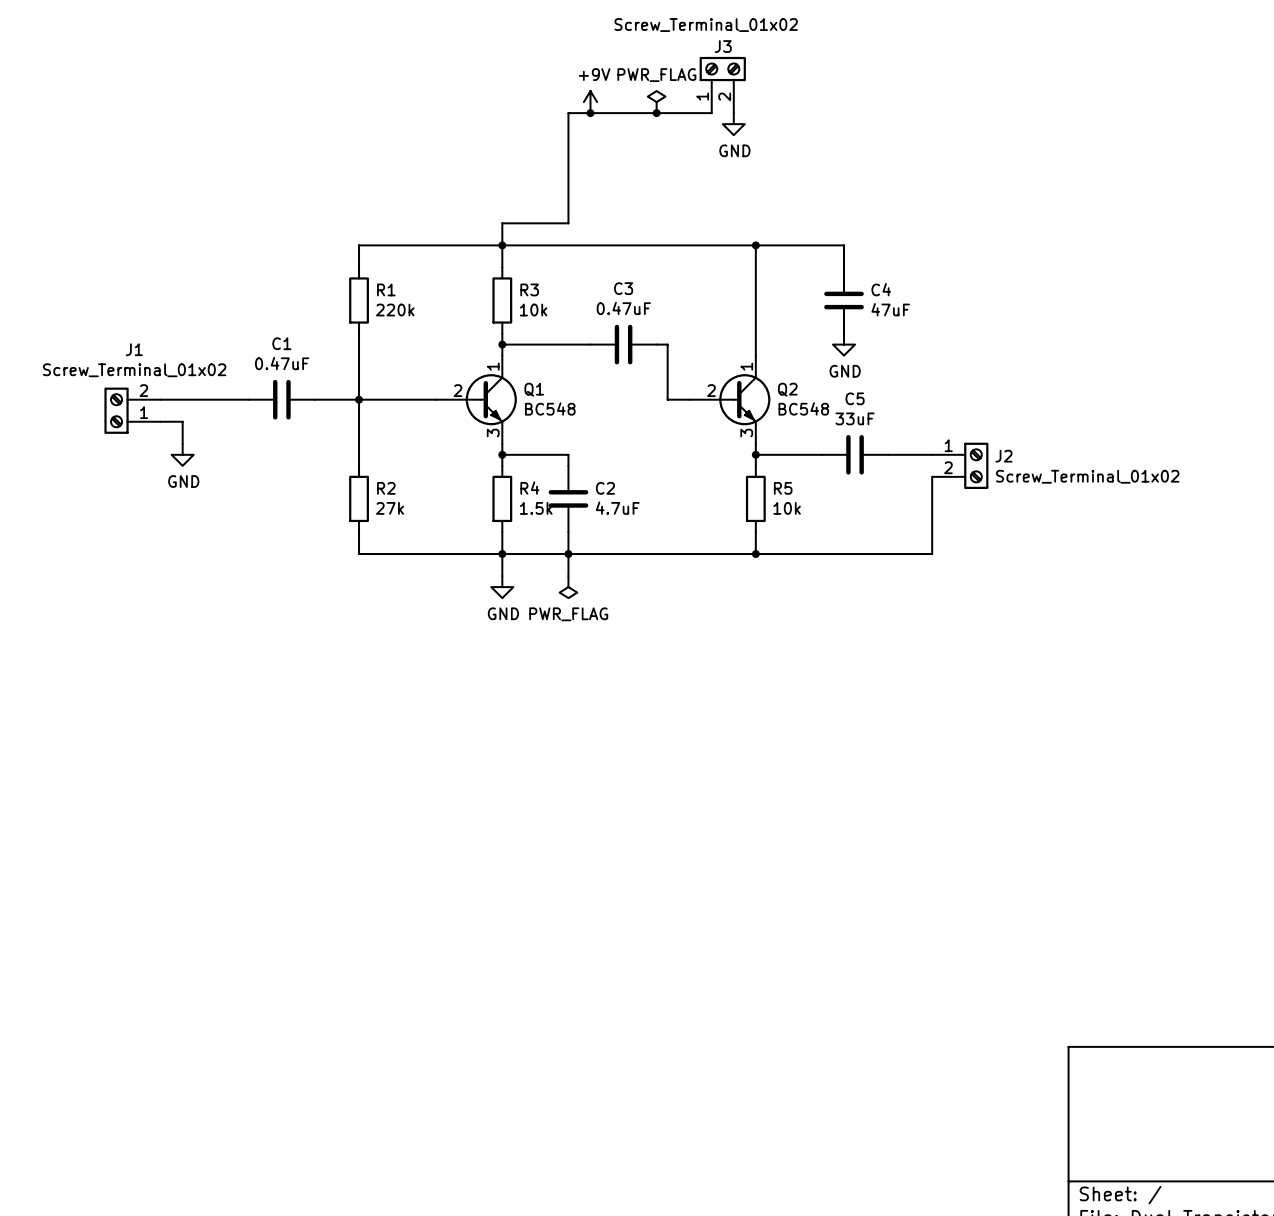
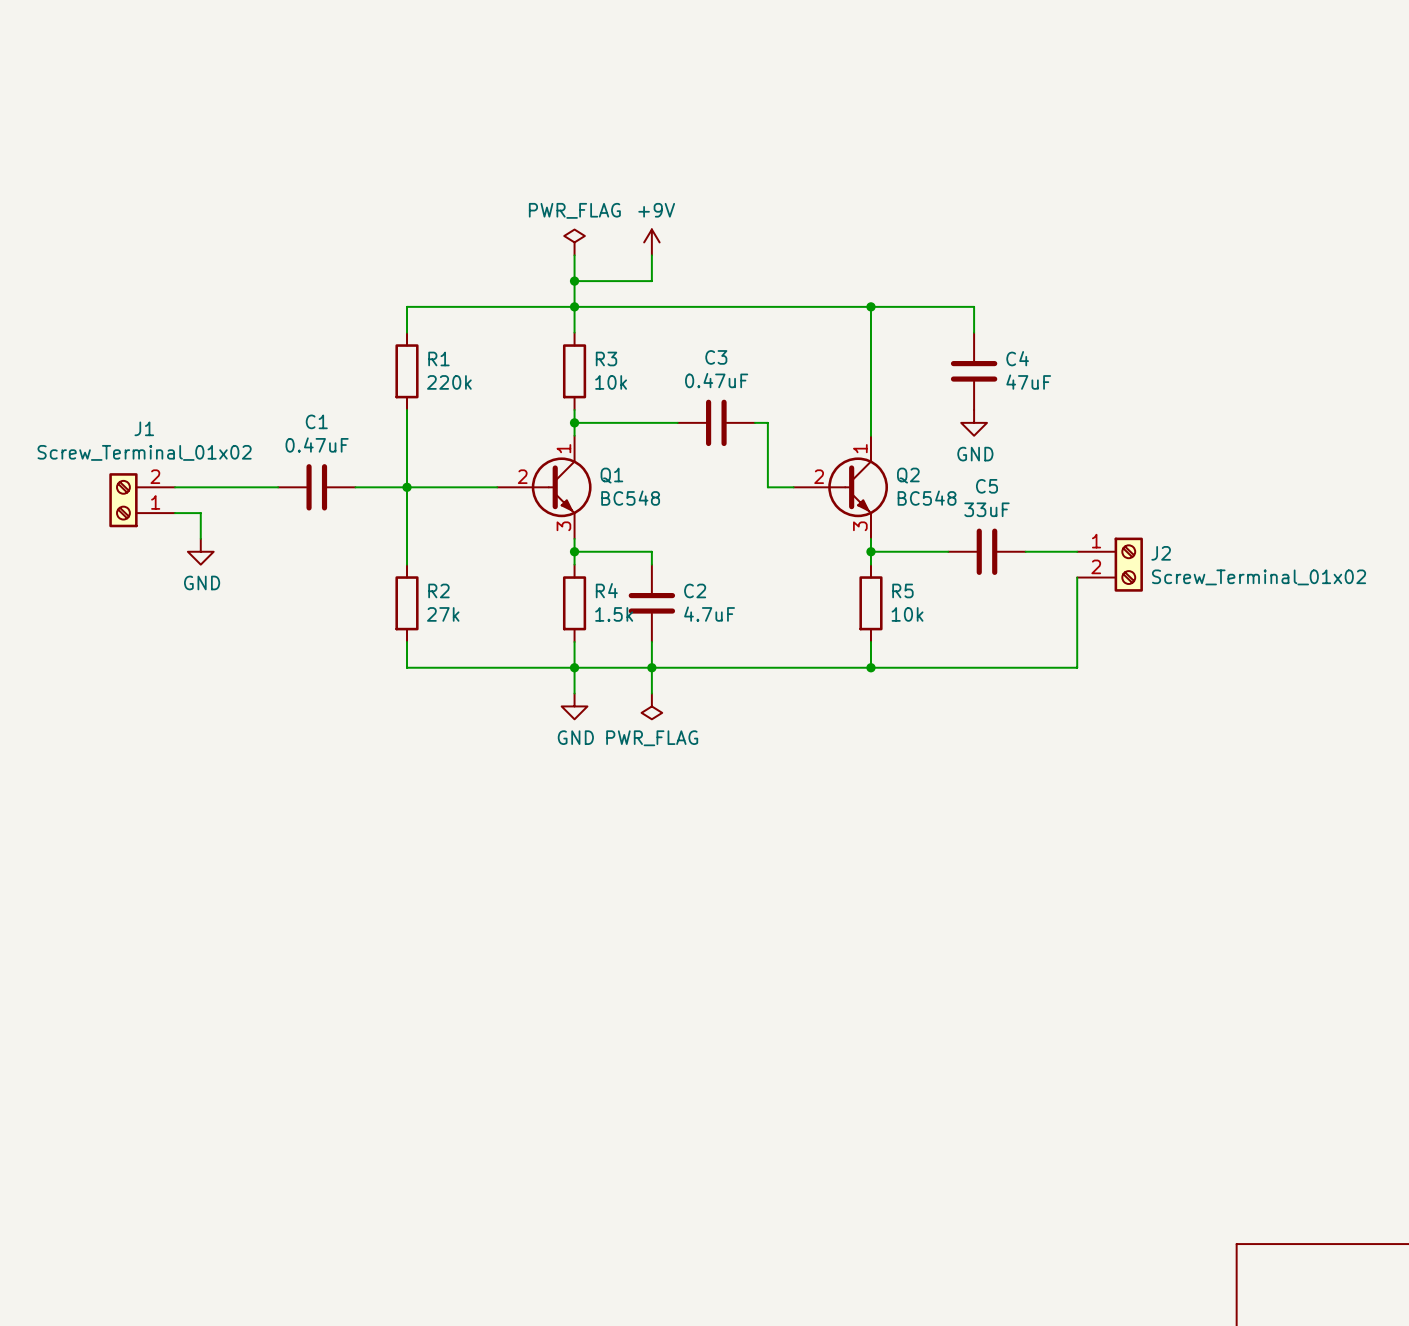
J3: Screw_Terminal_01x02 (722, 85) -> none
power symbol position: +9V (590, 102) -> +9V (651, 242)
power symbol position: PWR_FLAG (656, 102) -> PWR_FLAG (574, 242)
junction: (590, 113) -> none
junction: (656, 113) -> none
wire: (711, 113) (568, 113) (568, 201) -> none
power symbol: GND (733, 124) -> none
wire: none -> (574, 255) (574, 281)
junction: none -> (574, 281)

